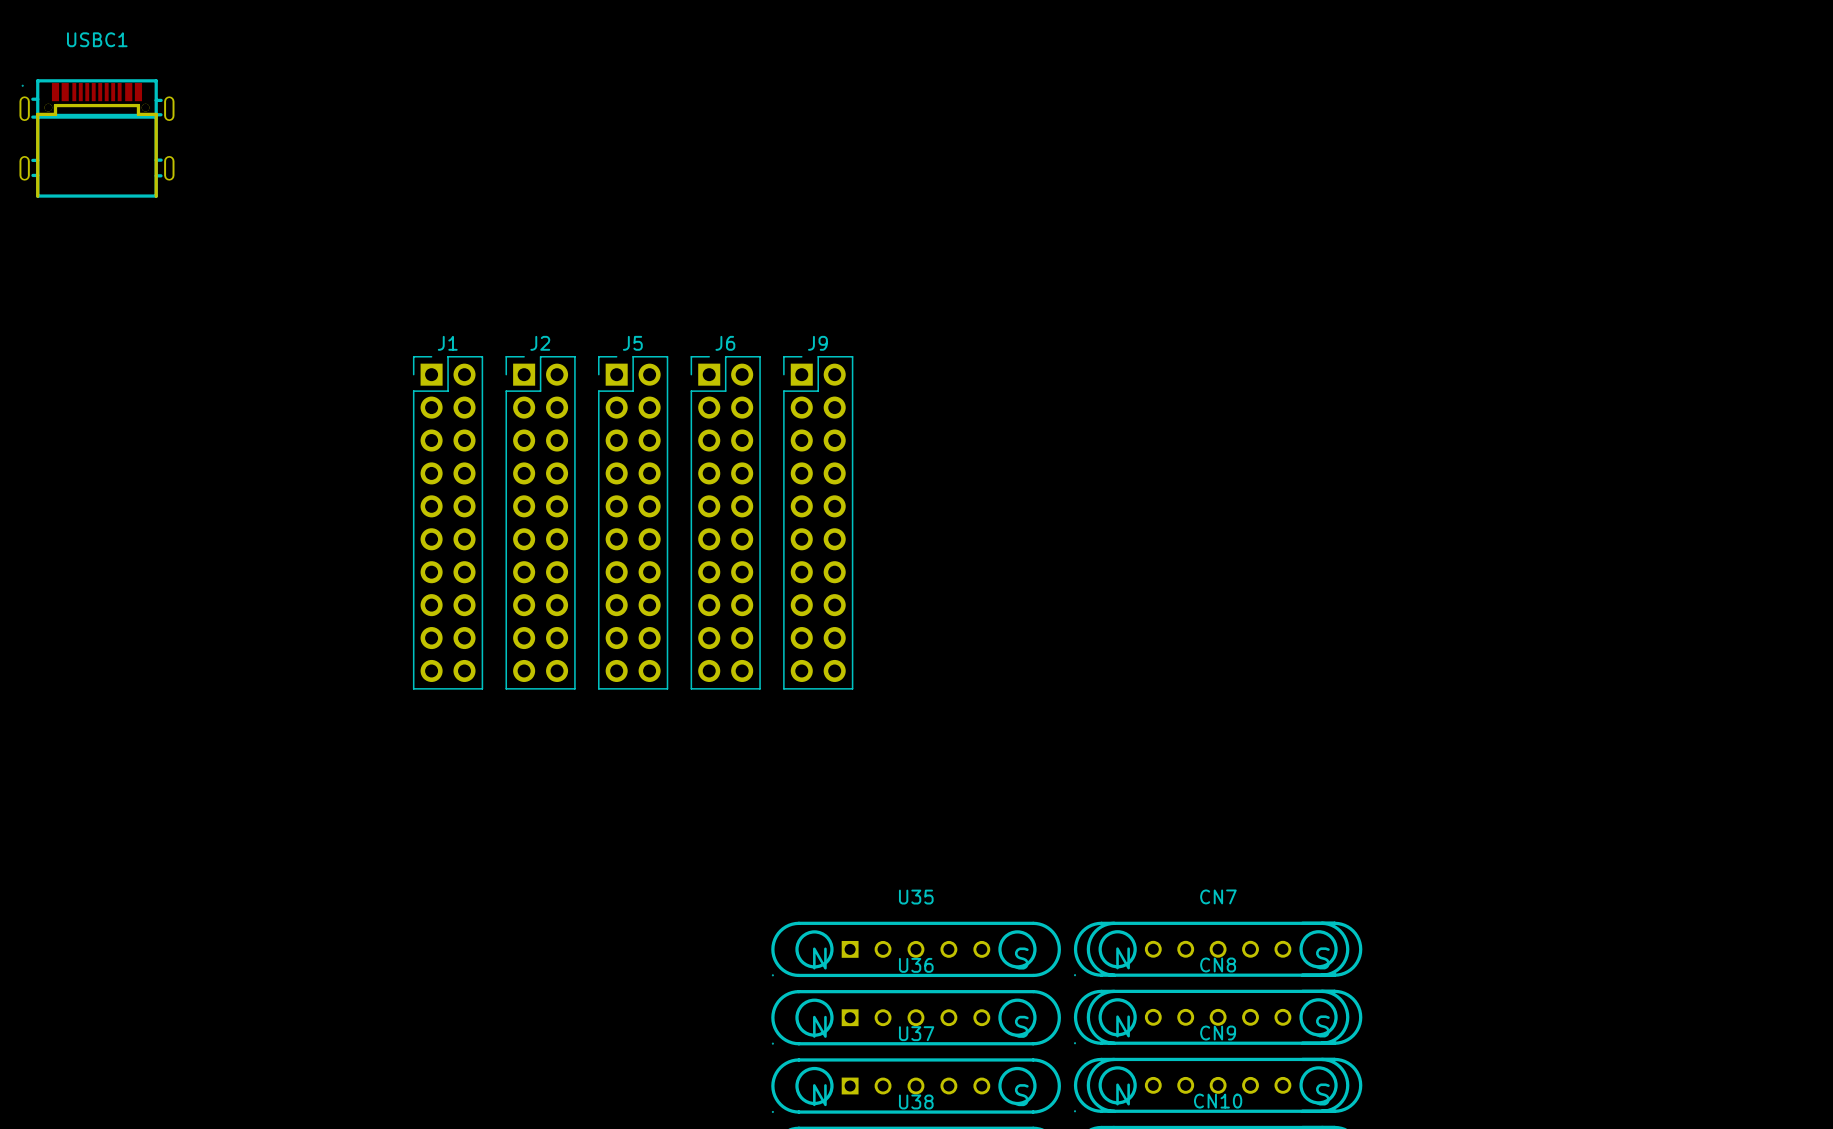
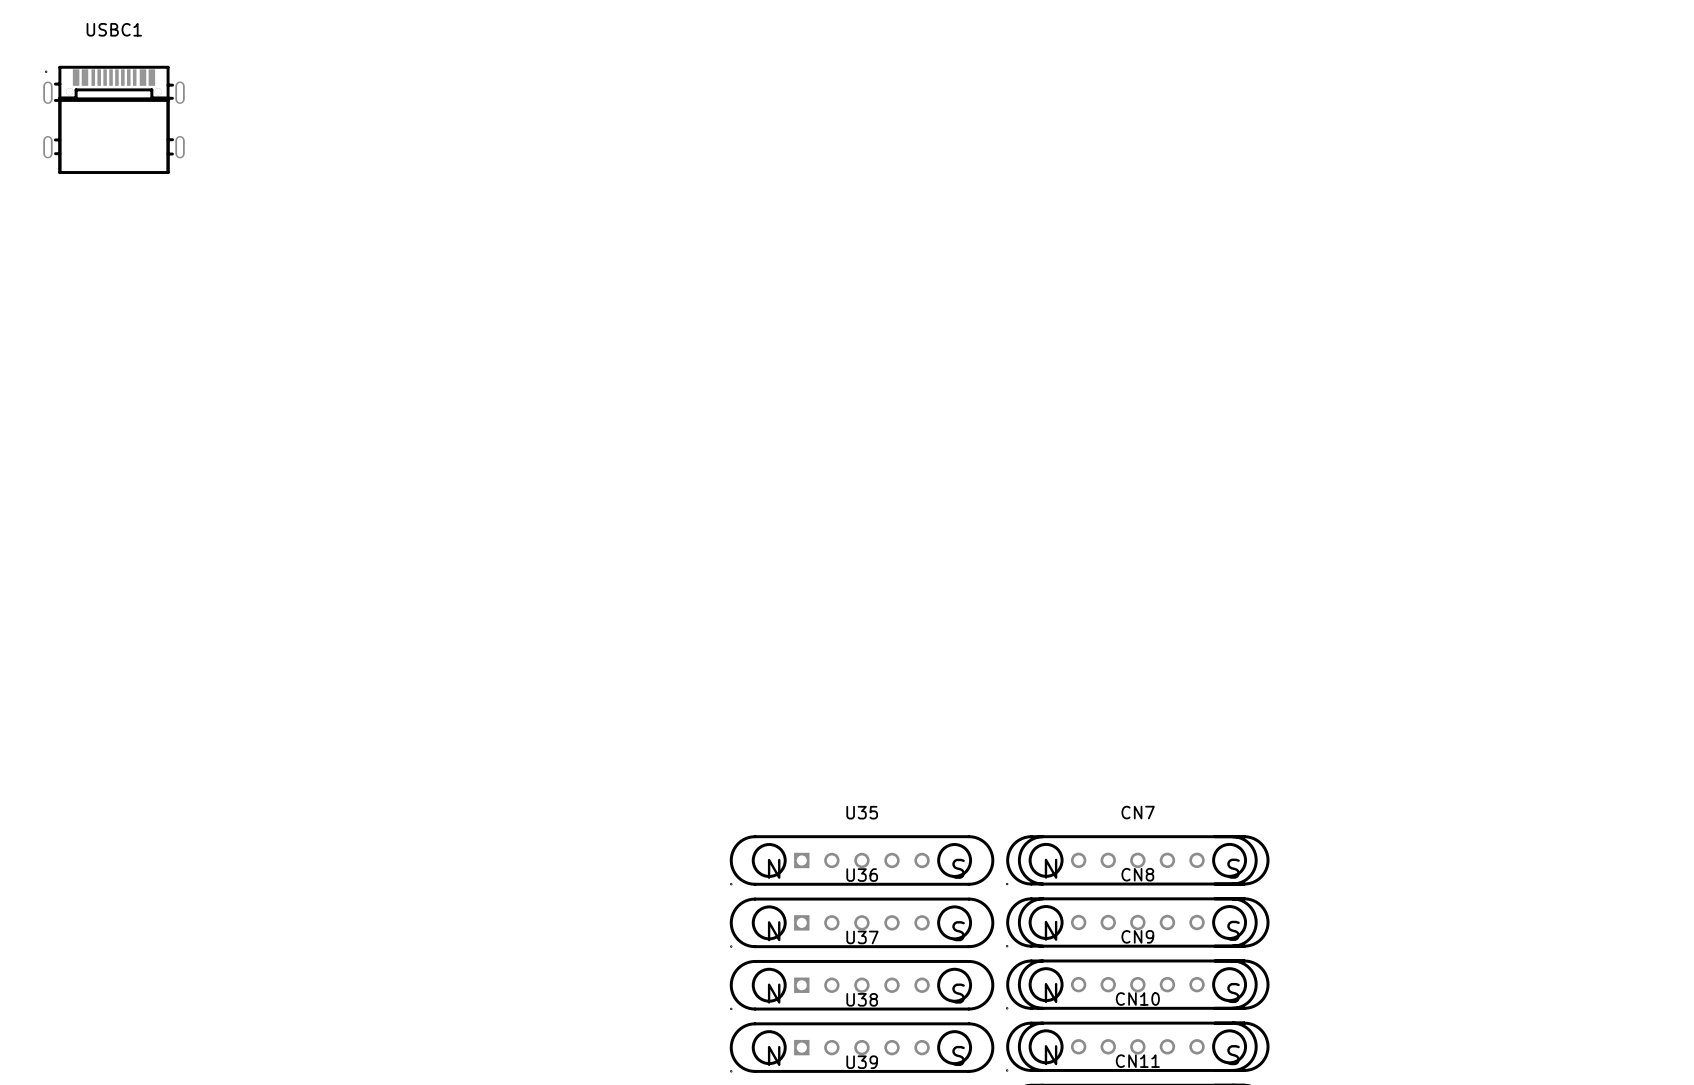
J1: (448, 522) -> none
J2: (540, 522) -> none
J5: (633, 522) -> none
J6: (725, 522) -> none
J9: (818, 522) -> none

